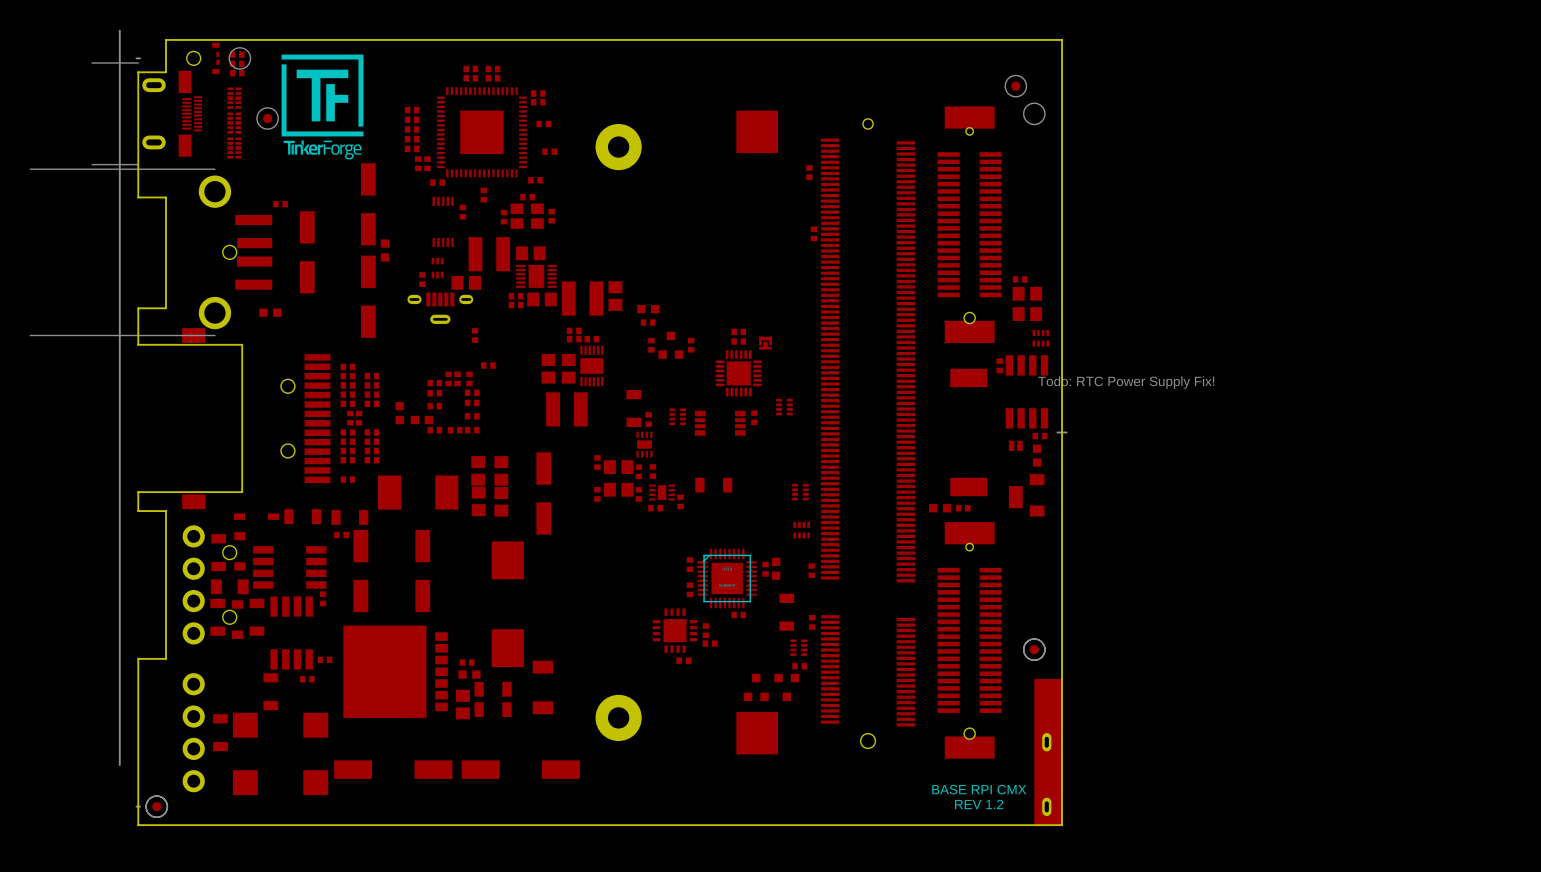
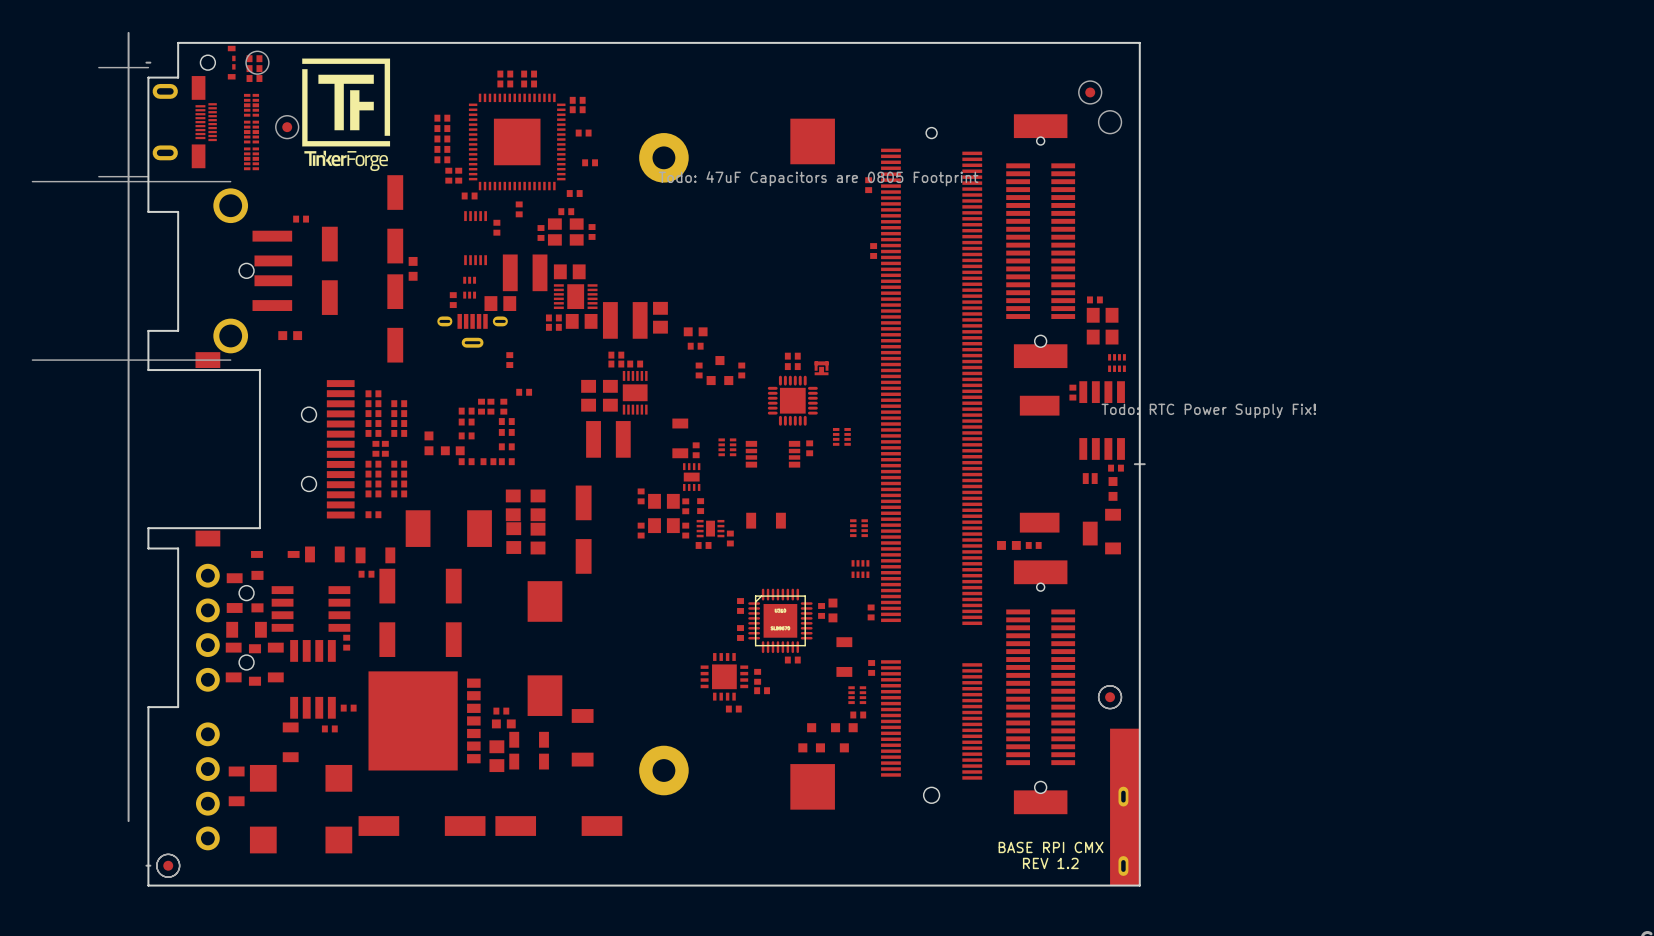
text: none -> Todo: 47uF Capacitors are 0805 Footprint (818, 178)

